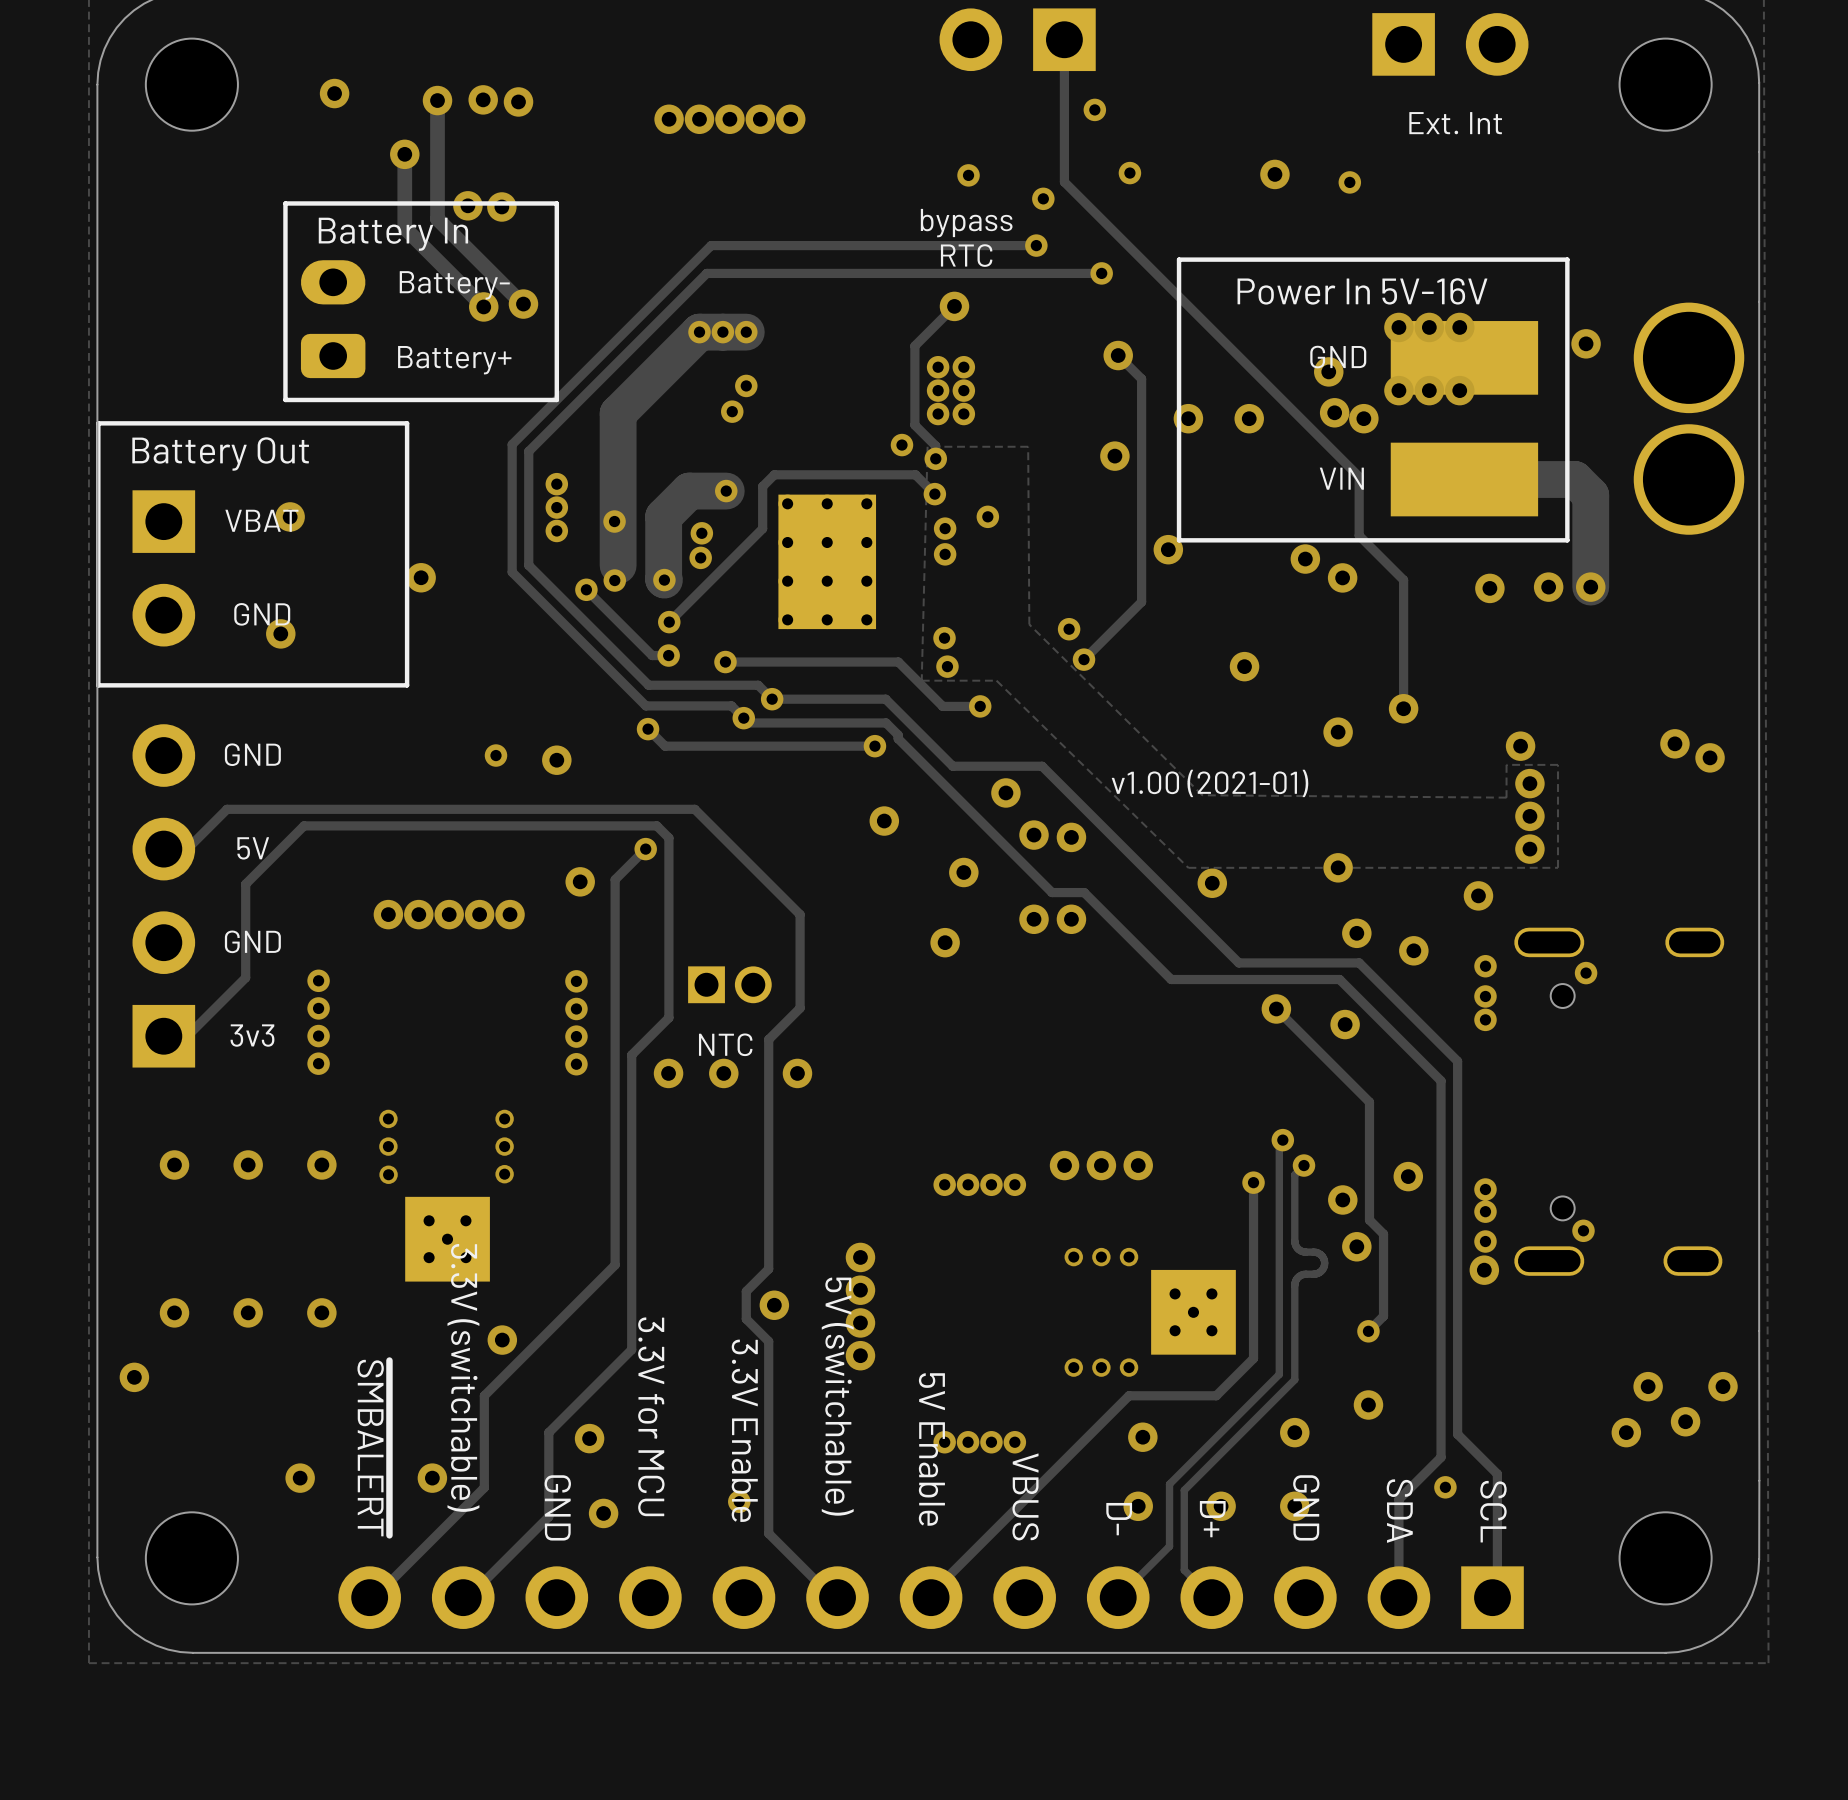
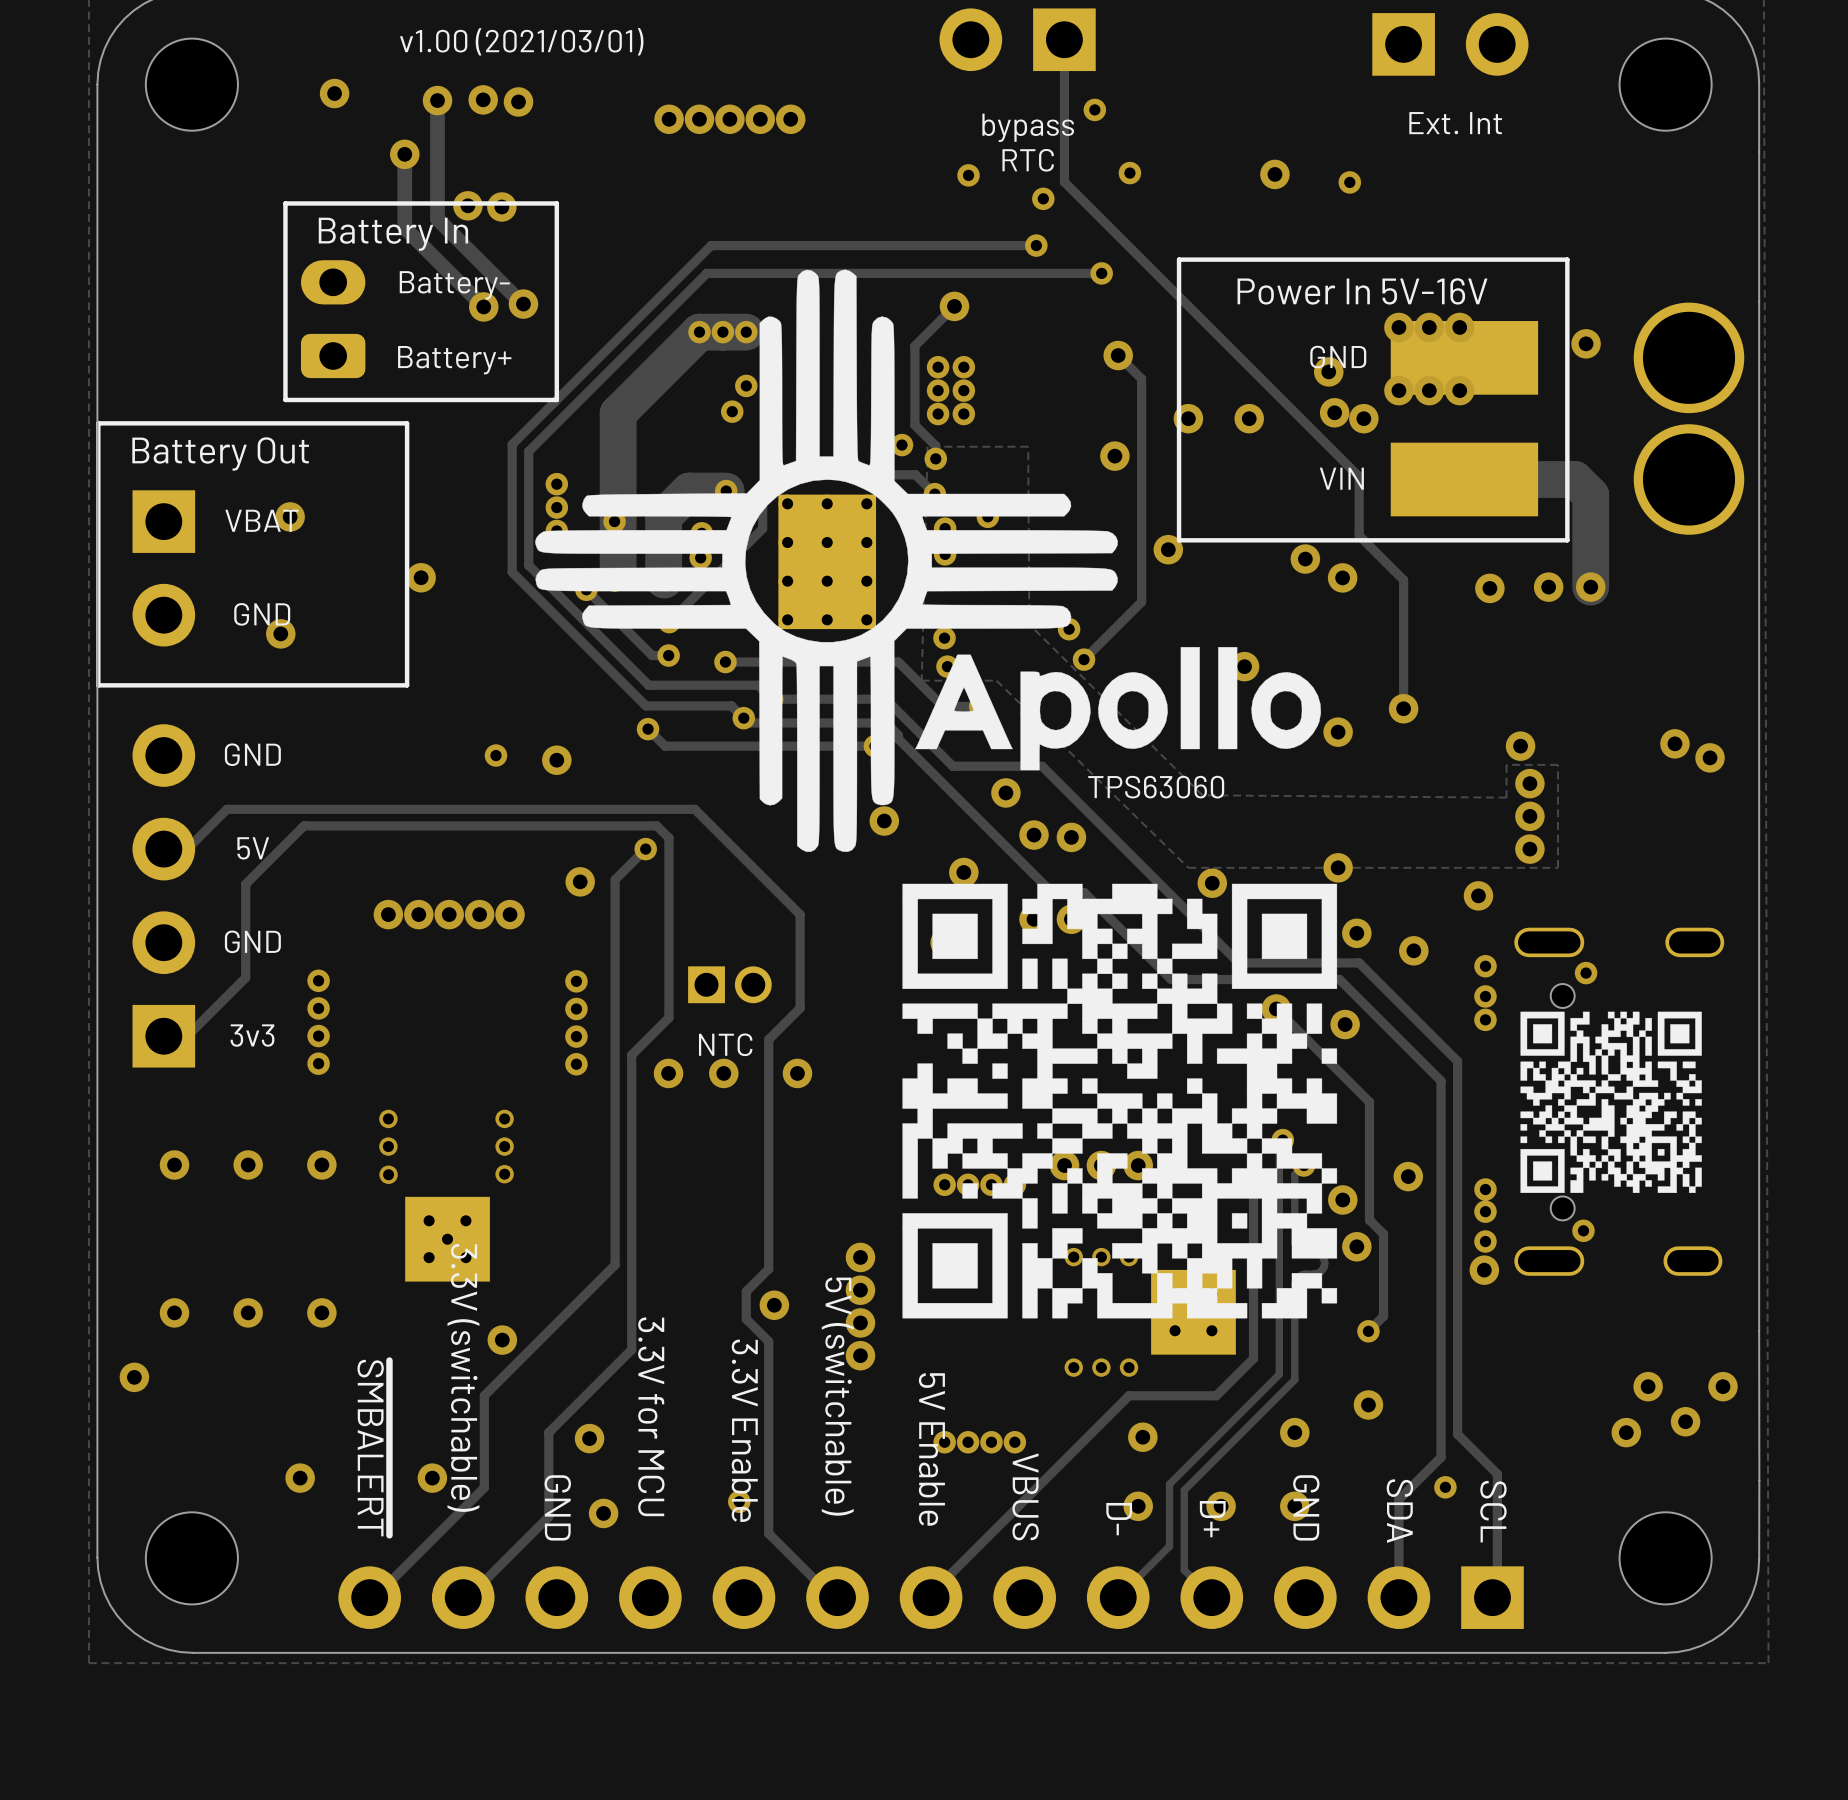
text: none -> v1.00 (2021/03/01) (521, 41)
text position: bypass (966, 223) -> bypass (1028, 127)
text position: RTC (966, 255) -> RTC (1028, 160)
drawing: none -> [535, 269, 1338, 1319]
text: v1.00 (2021-01) (1210, 783) -> none
text: none -> TPS63060 (1156, 787)
drawing: none -> [1520, 1011, 1702, 1194]

